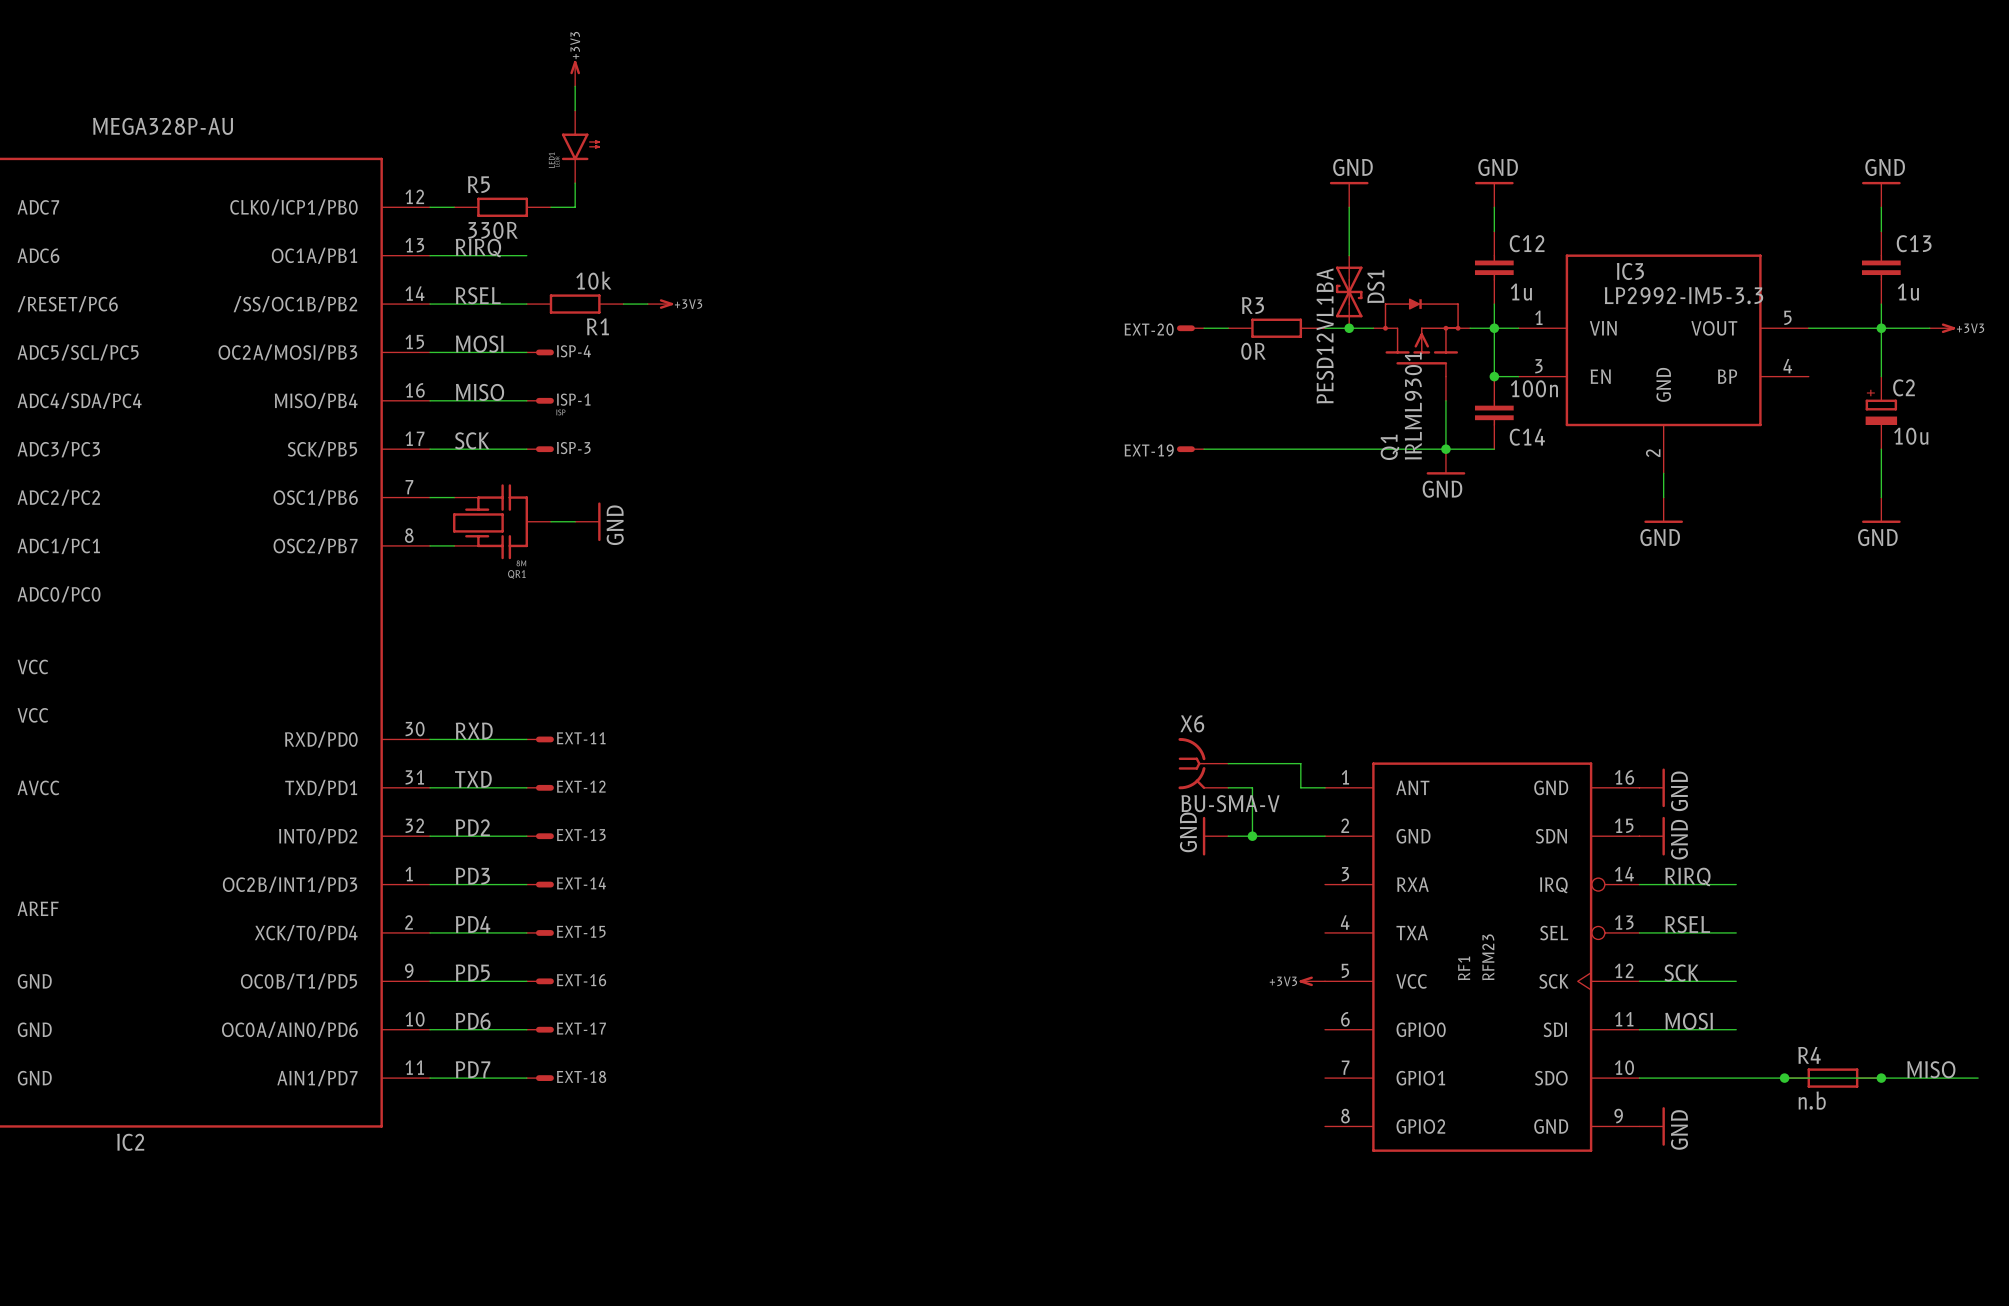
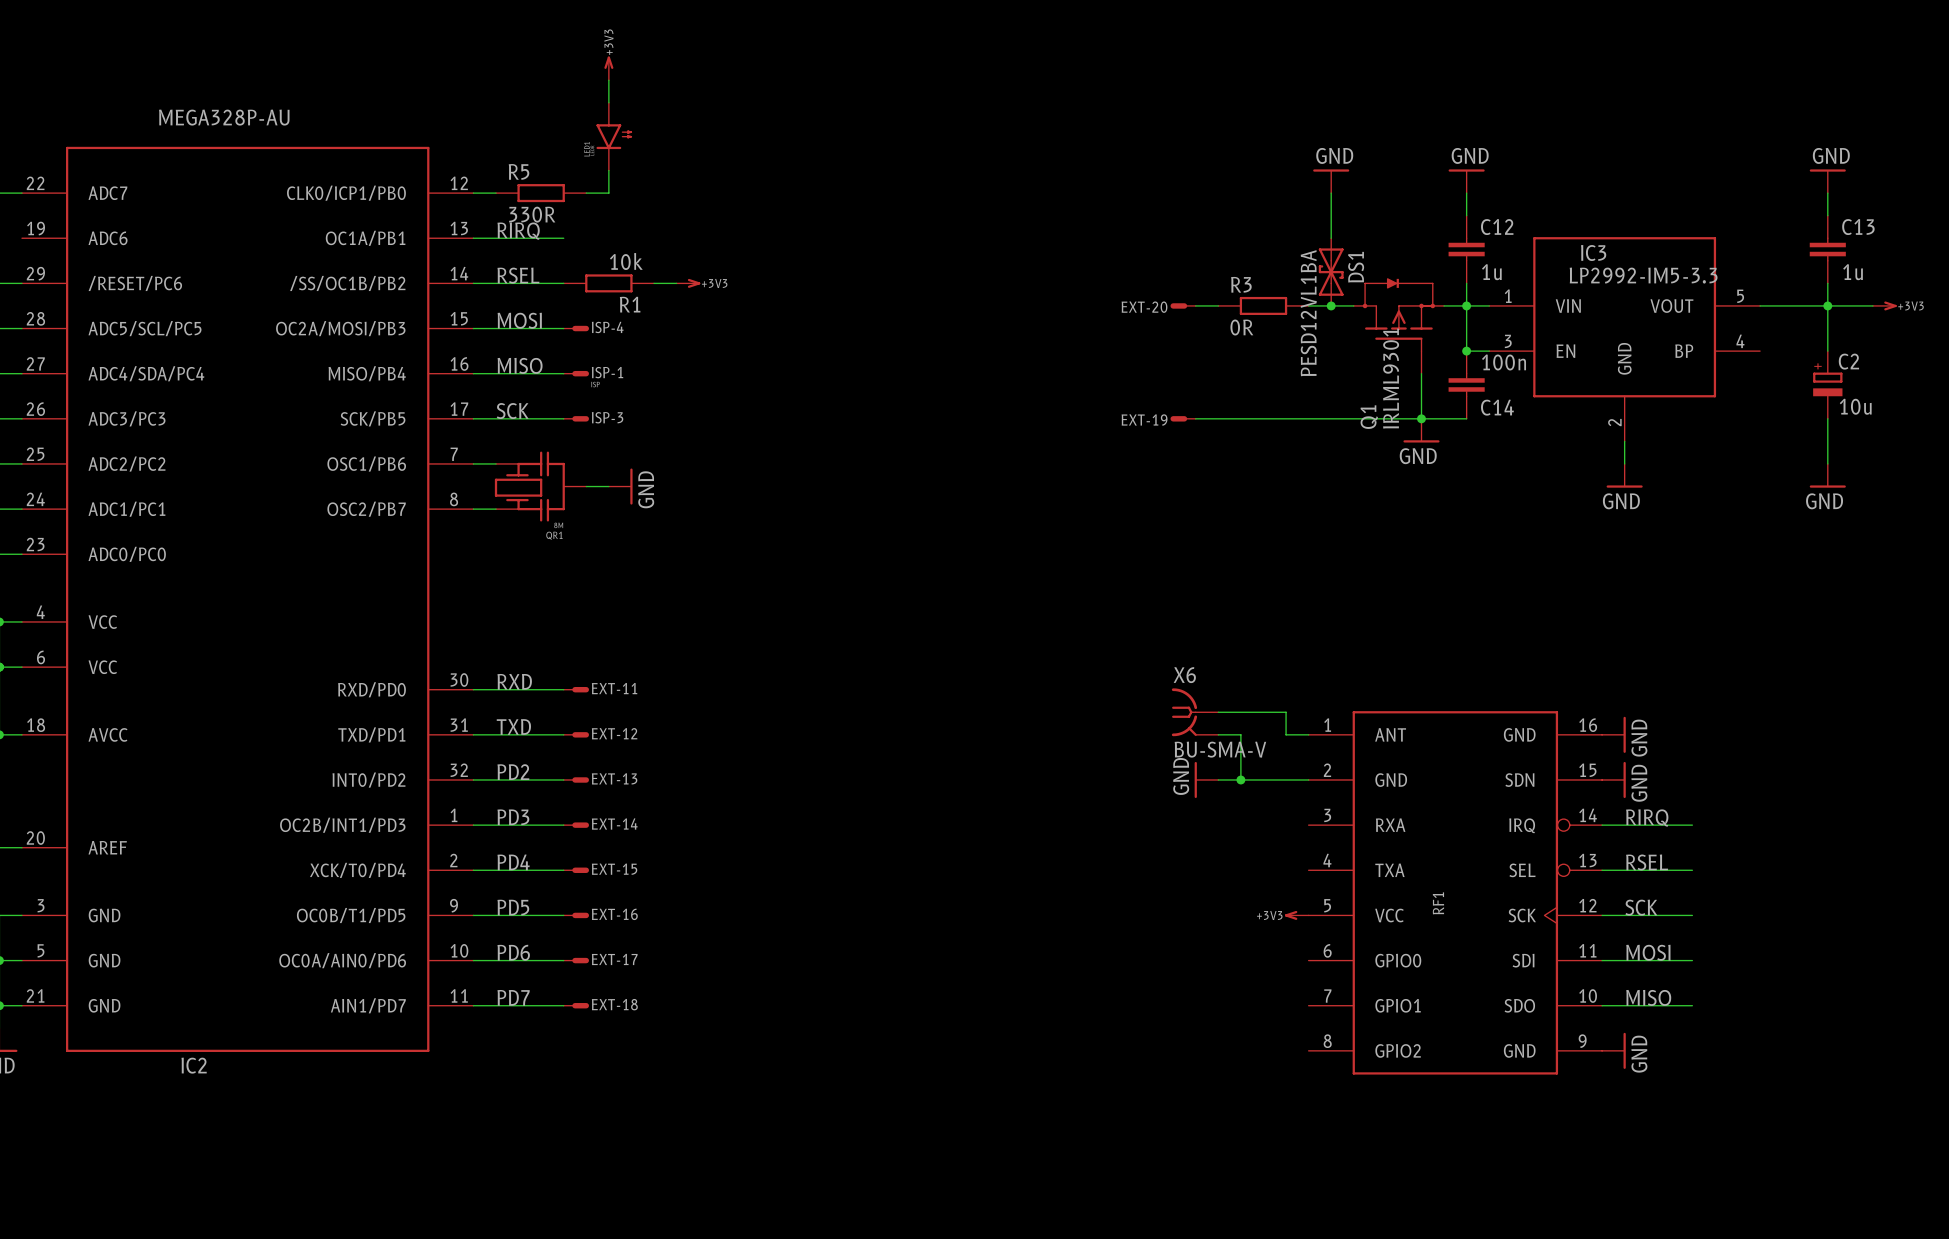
RF1 value: RFM23 (1488, 957) -> none
label: none -> MISO (1648, 997)
label: MISO (1931, 1069) -> none
wire: (1736, 1078) (1978, 1078) -> none
junction: (1784, 1078) -> none
R4: n.b (1832, 1078) -> none
junction: (1881, 1078) -> none

